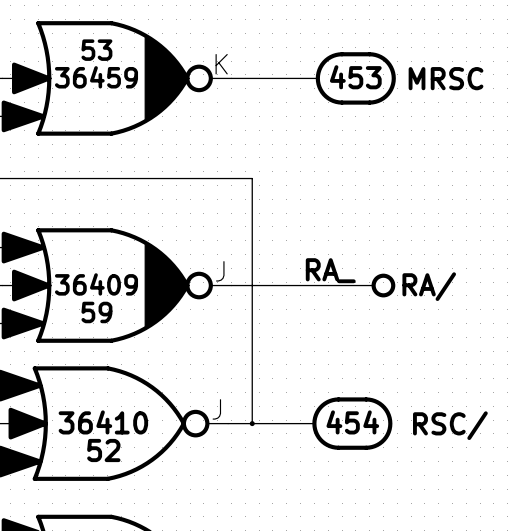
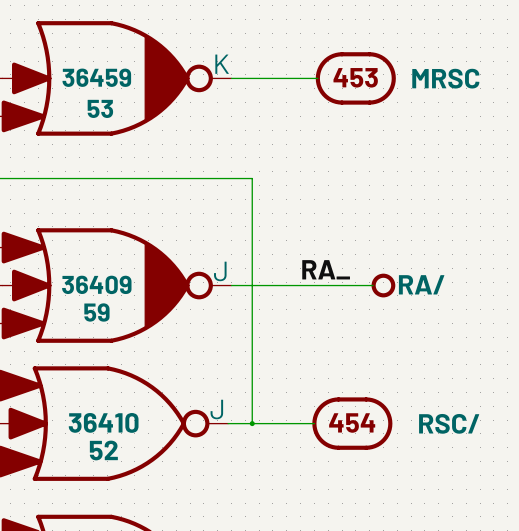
part text position: 53 (96, 50) -> 53 (100, 108)

